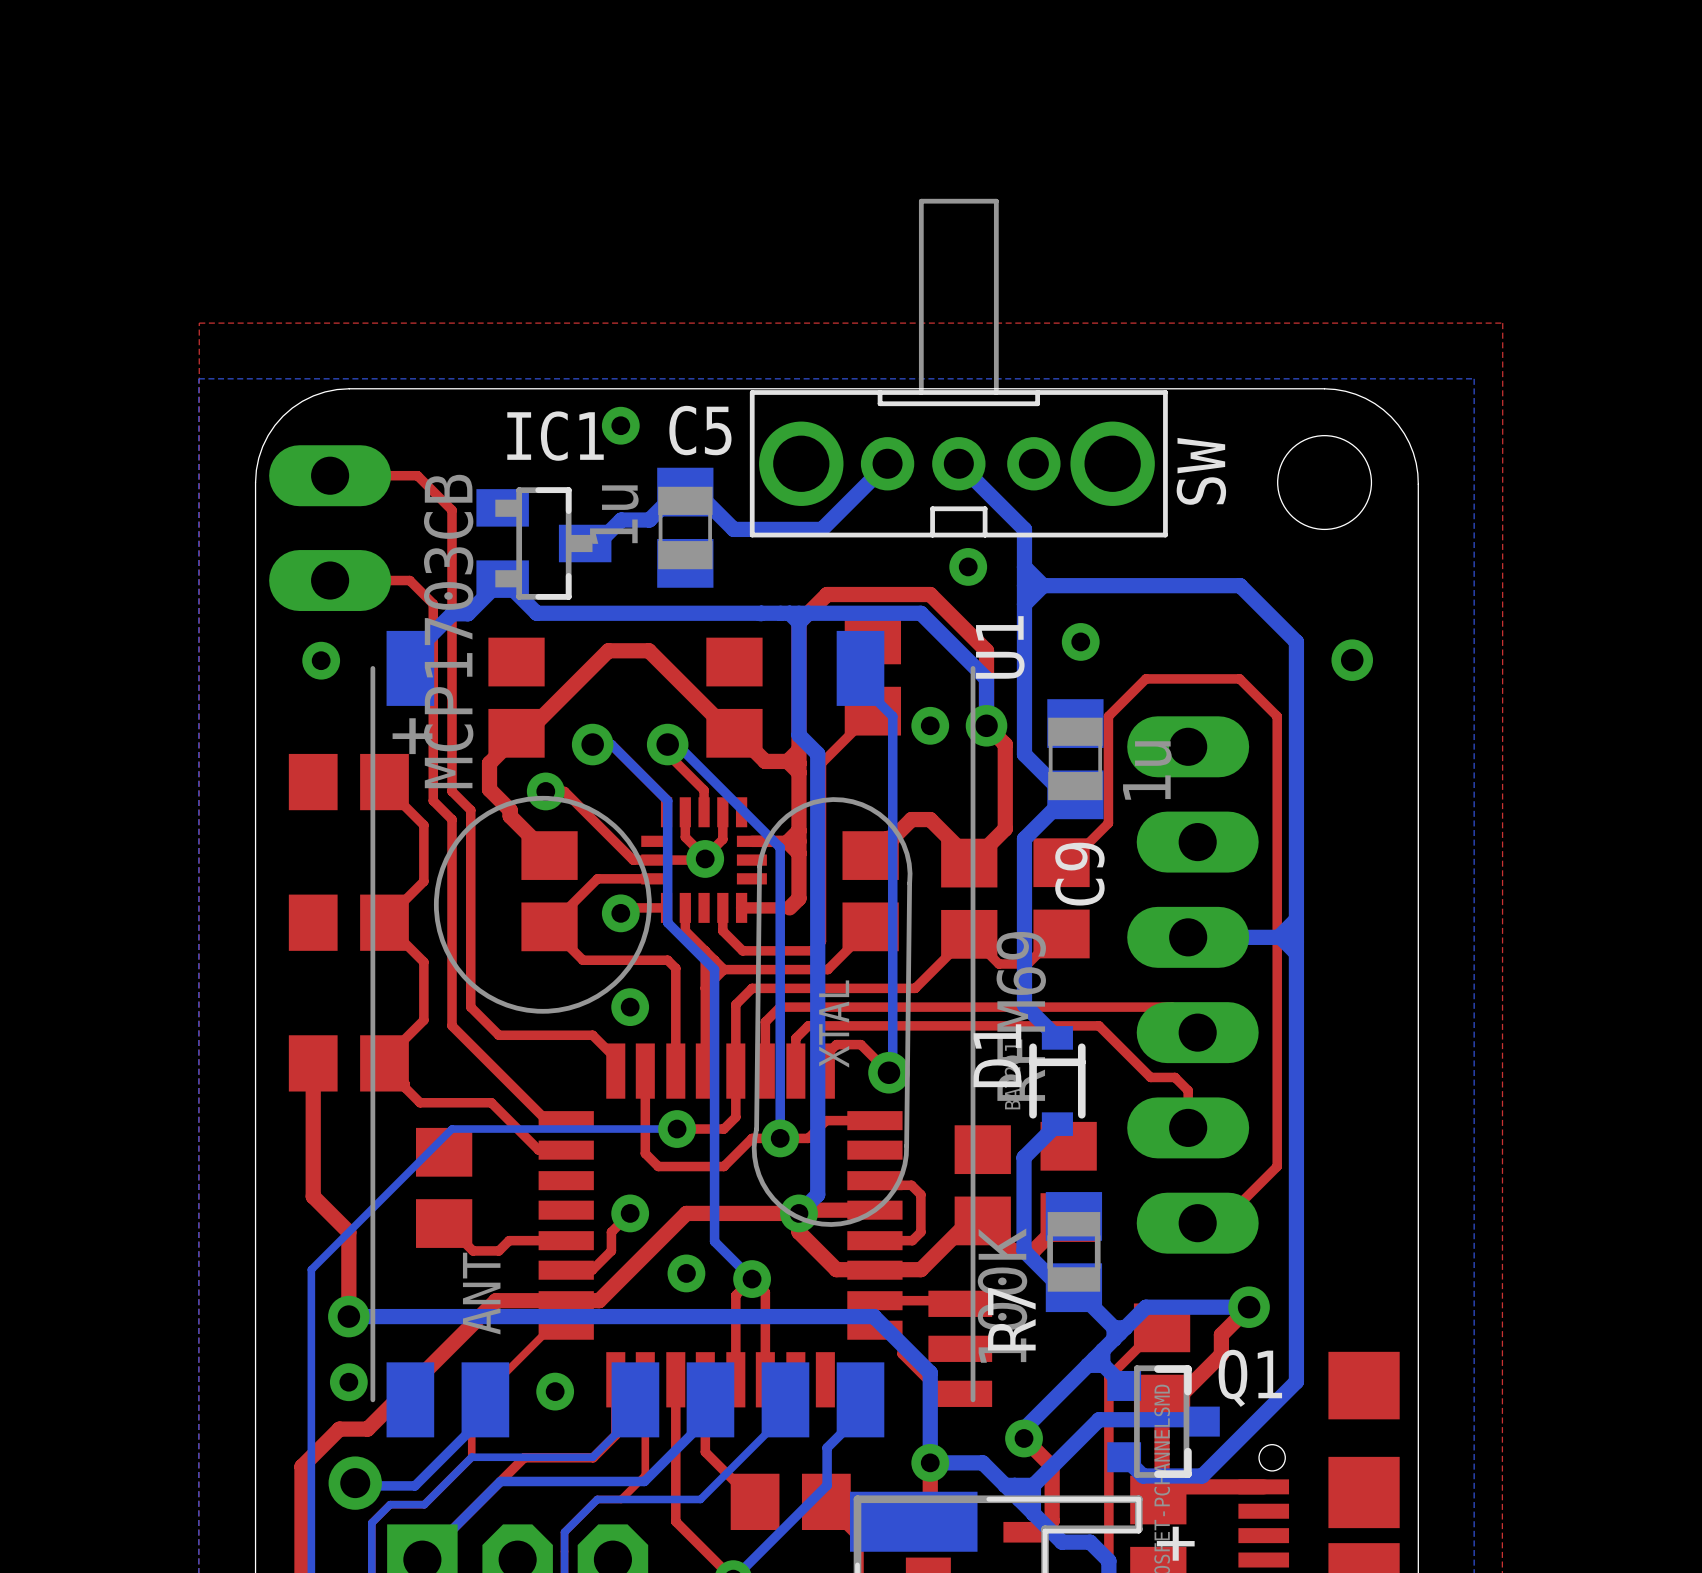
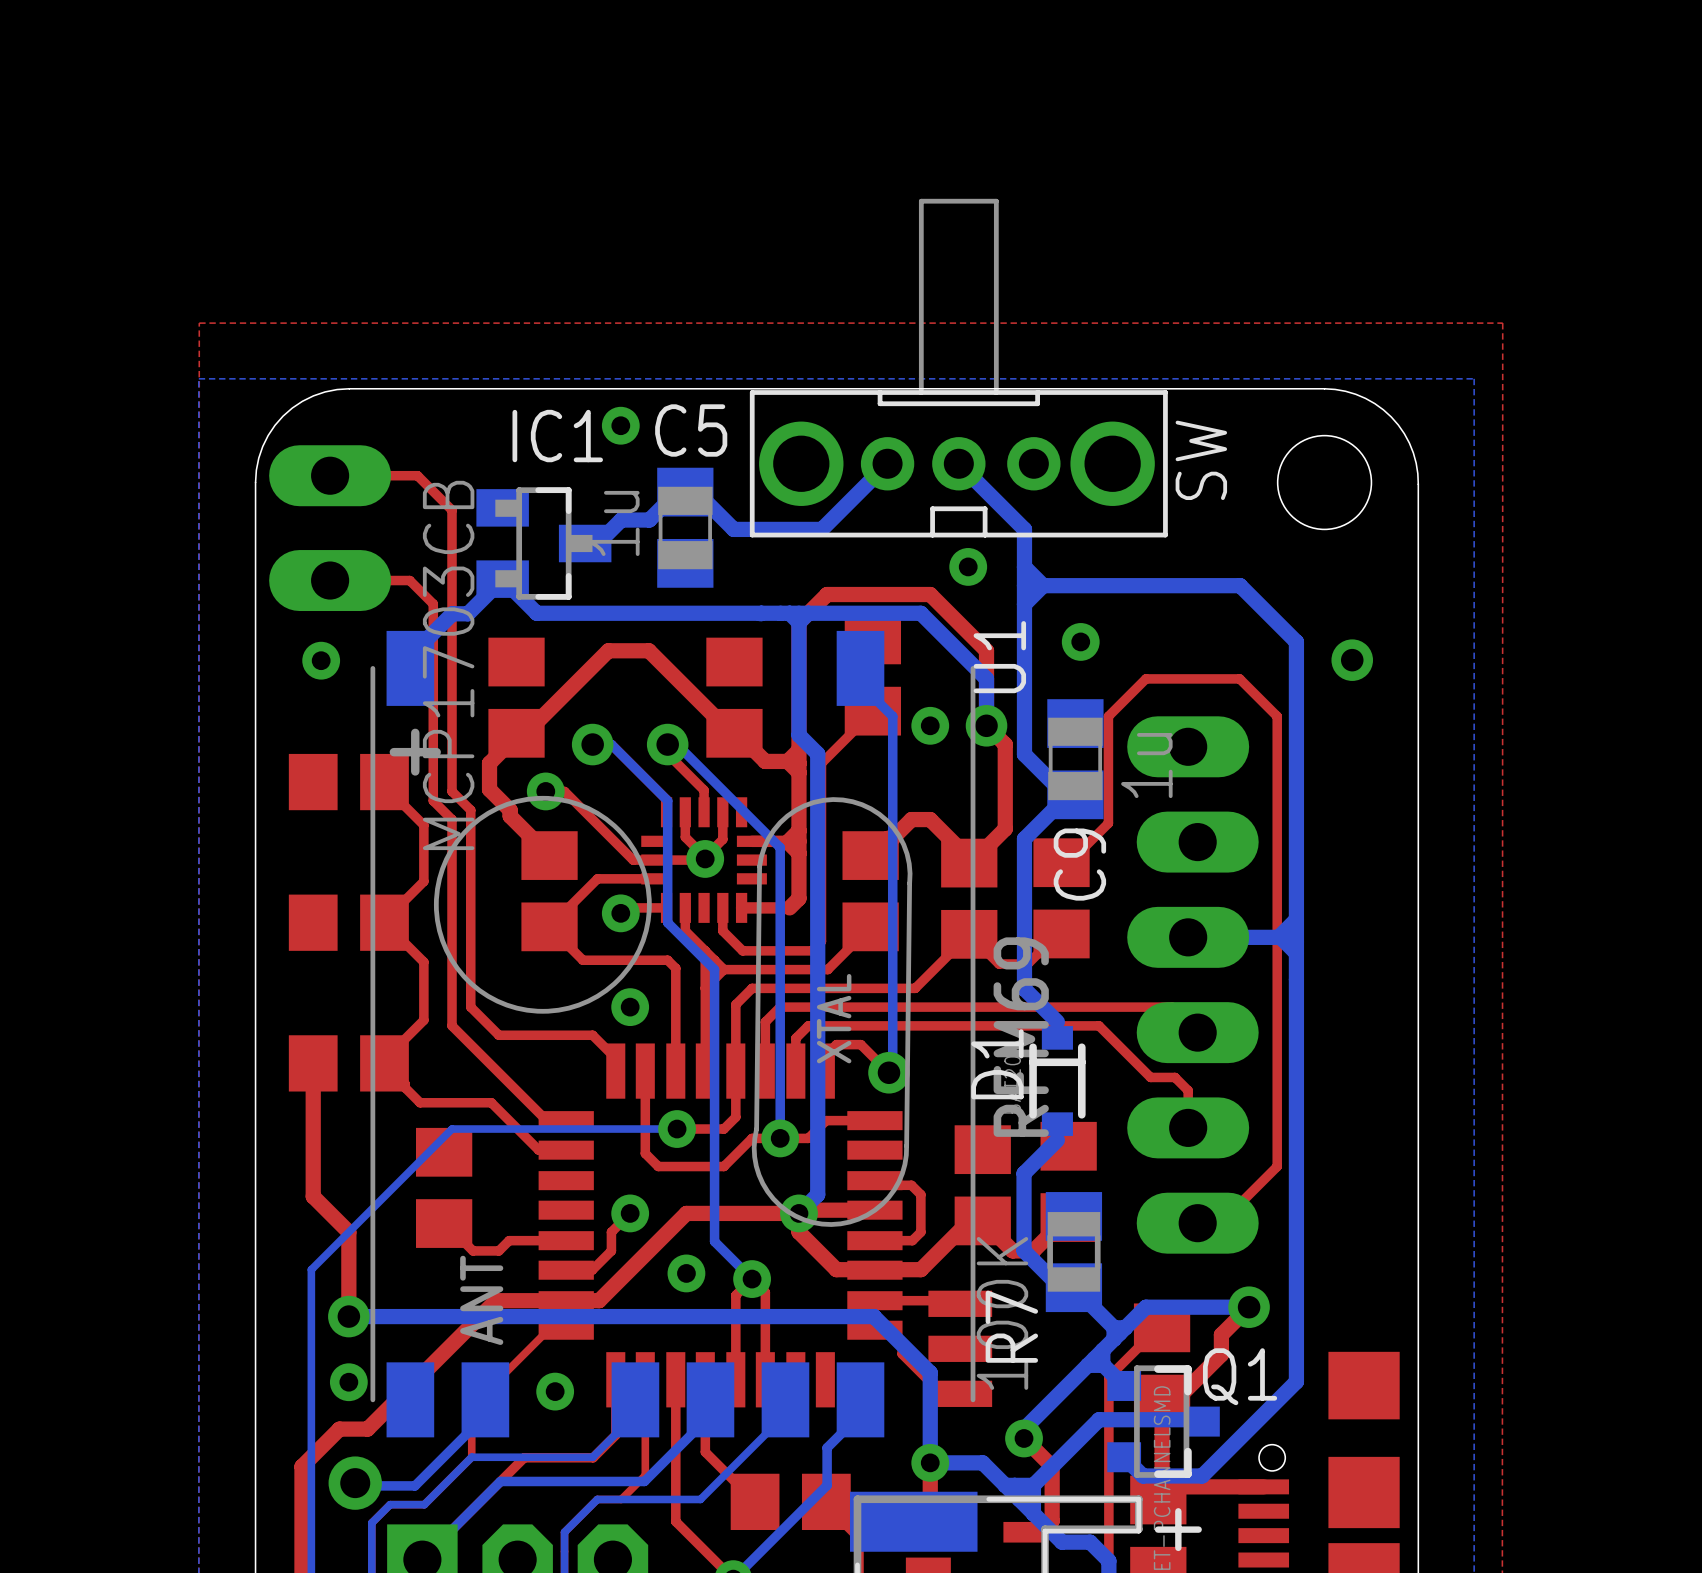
bottom track: (1024, 989) (1024, 1004) (1057, 1037) -> (1024, 989) (1057, 1021)
bottom track: (1057, 1124) (1024, 1157) (1024, 1173) -> (1057, 1140) (1024, 1173)

